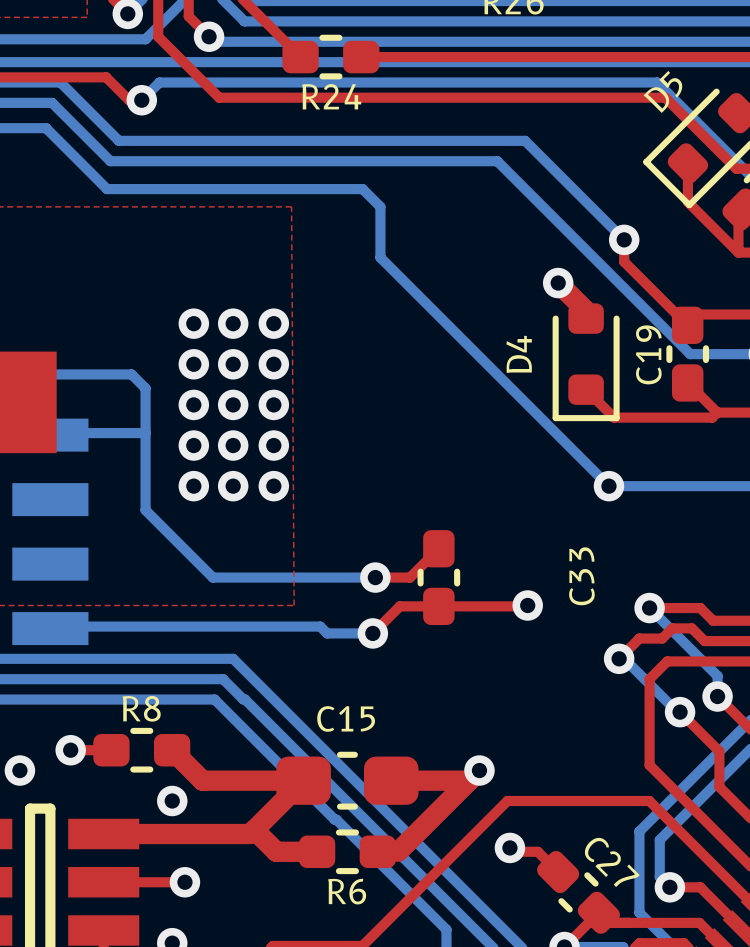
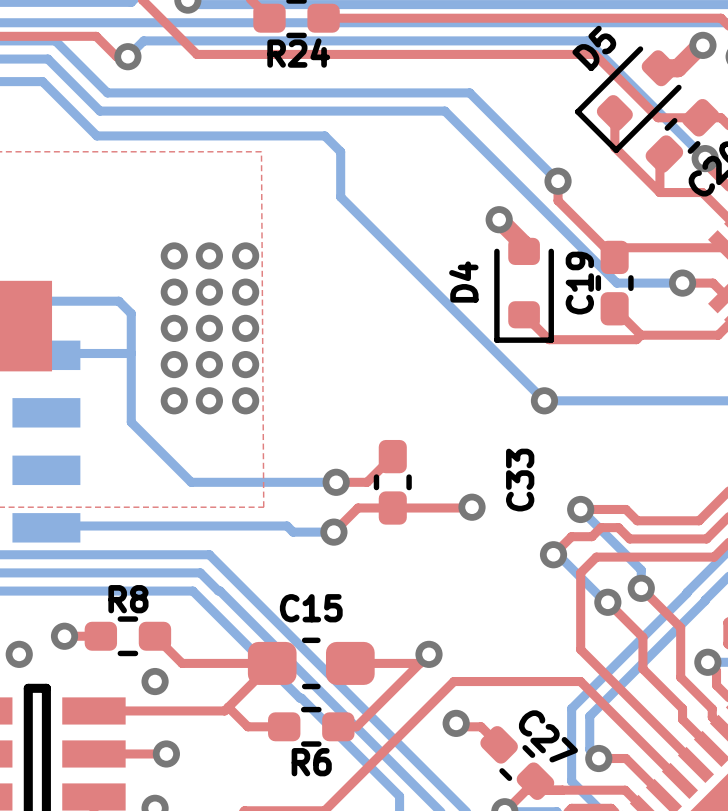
top track width: thick (172, 750) (202, 780) (303, 780) (254, 829) (276, 851) (317, 851) -> thin (154, 636) (182, 663) (272, 663) (228, 707) (247, 726) (284, 726)
top track width: thick (391, 780) (469, 780) (398, 851) -> thin (350, 663) (419, 663) (356, 726)
top track width: thick (103, 834) (250, 834) -> thin (93, 710) (224, 710)

